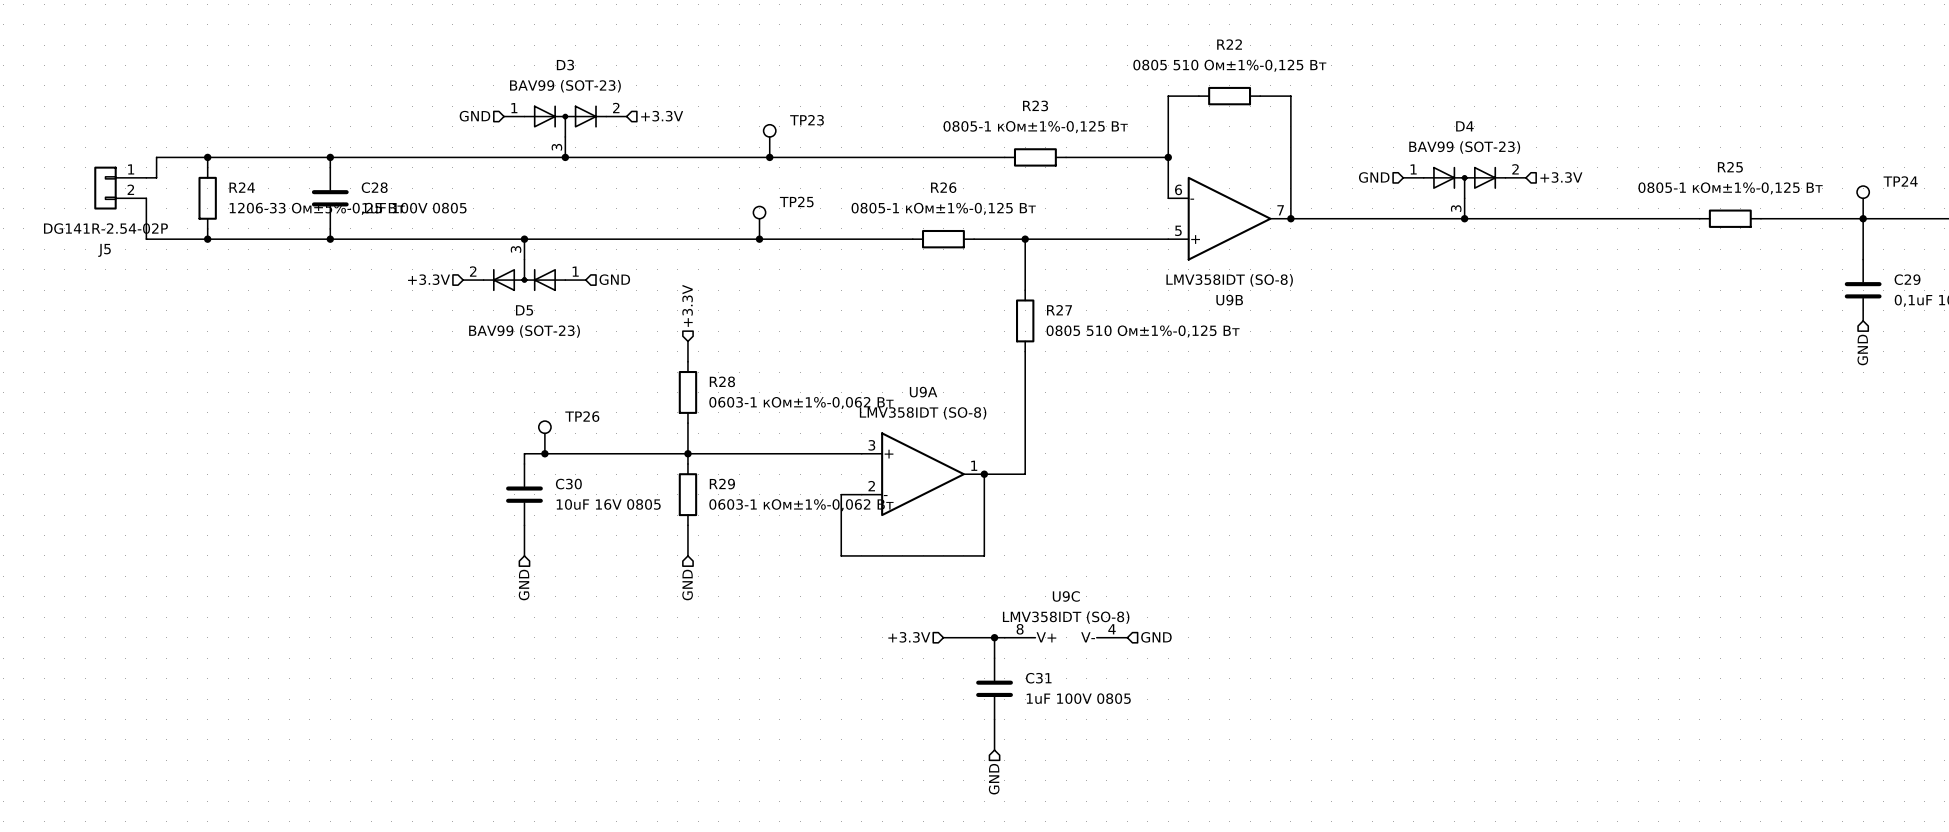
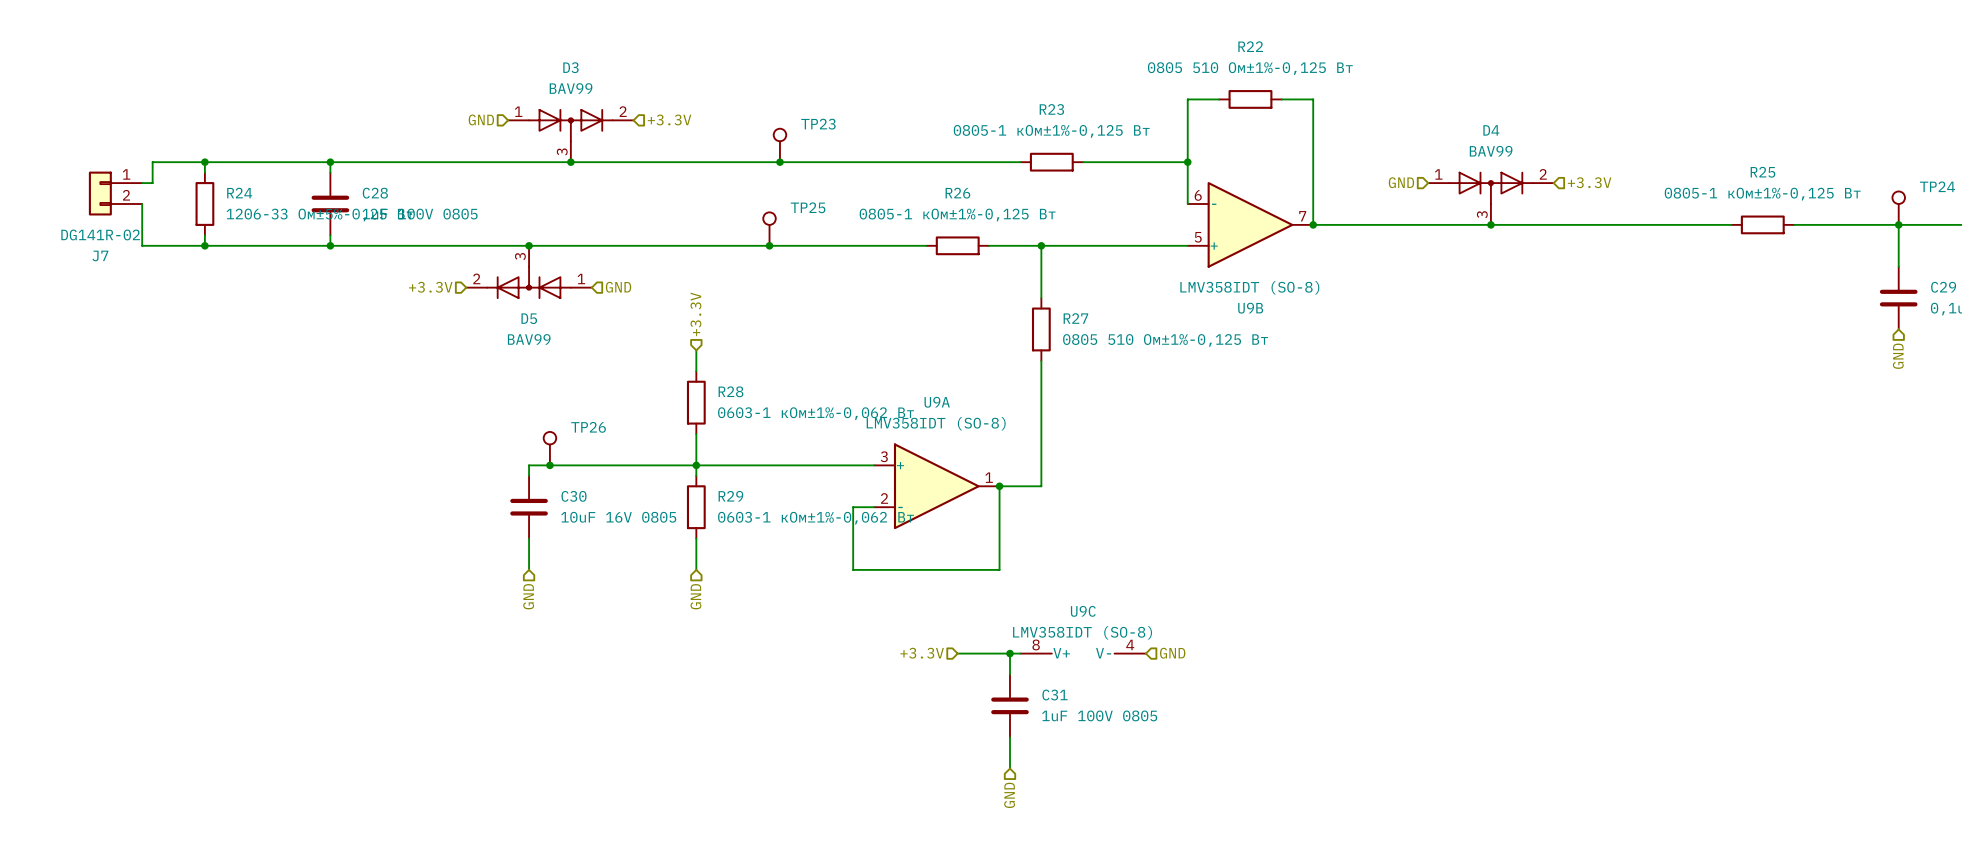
D3 value: BAV99 (SOT-23) (565, 86) -> BAV99 (571, 88)
D4 value: BAV99 (SOT-23) (1464, 147) -> BAV99 (1491, 151)
J5 value: DG141R-2.54-02P (105, 228) -> DG141R-02 (100, 234)
J5 name: J5 (104, 250) -> J7 (100, 255)
D5 value: BAV99 (SOT-23) (524, 331) -> BAV99 (529, 339)

